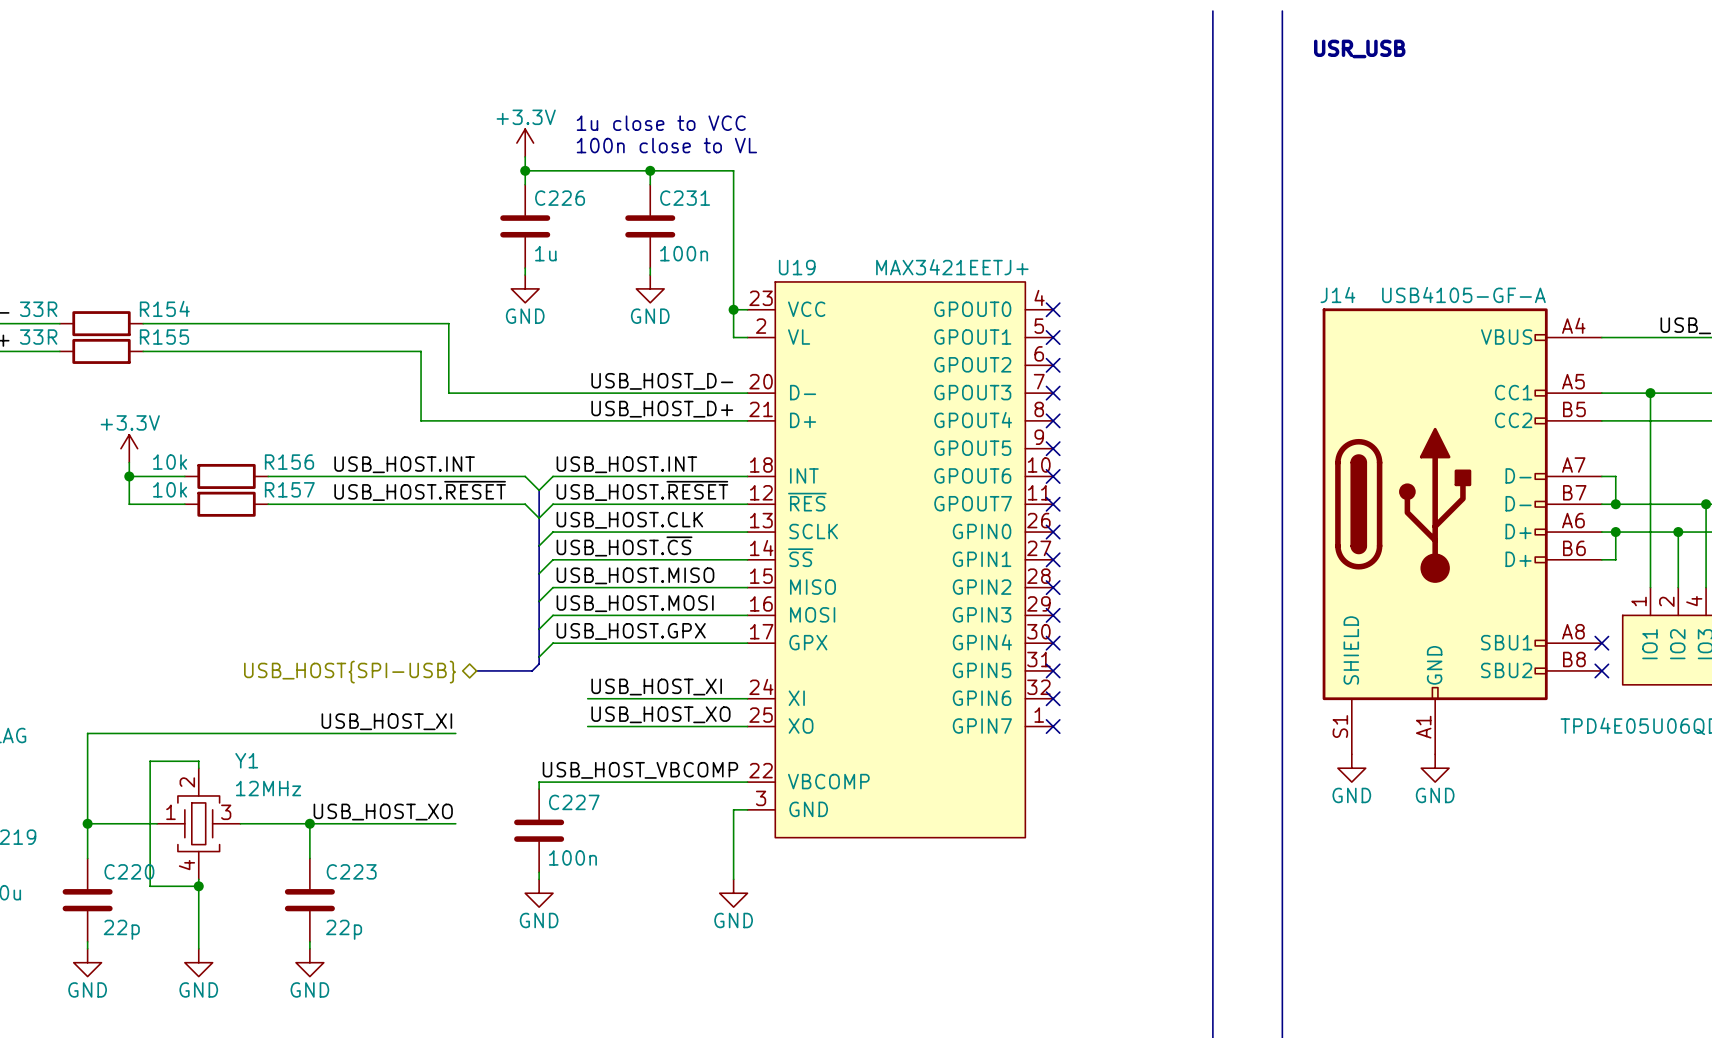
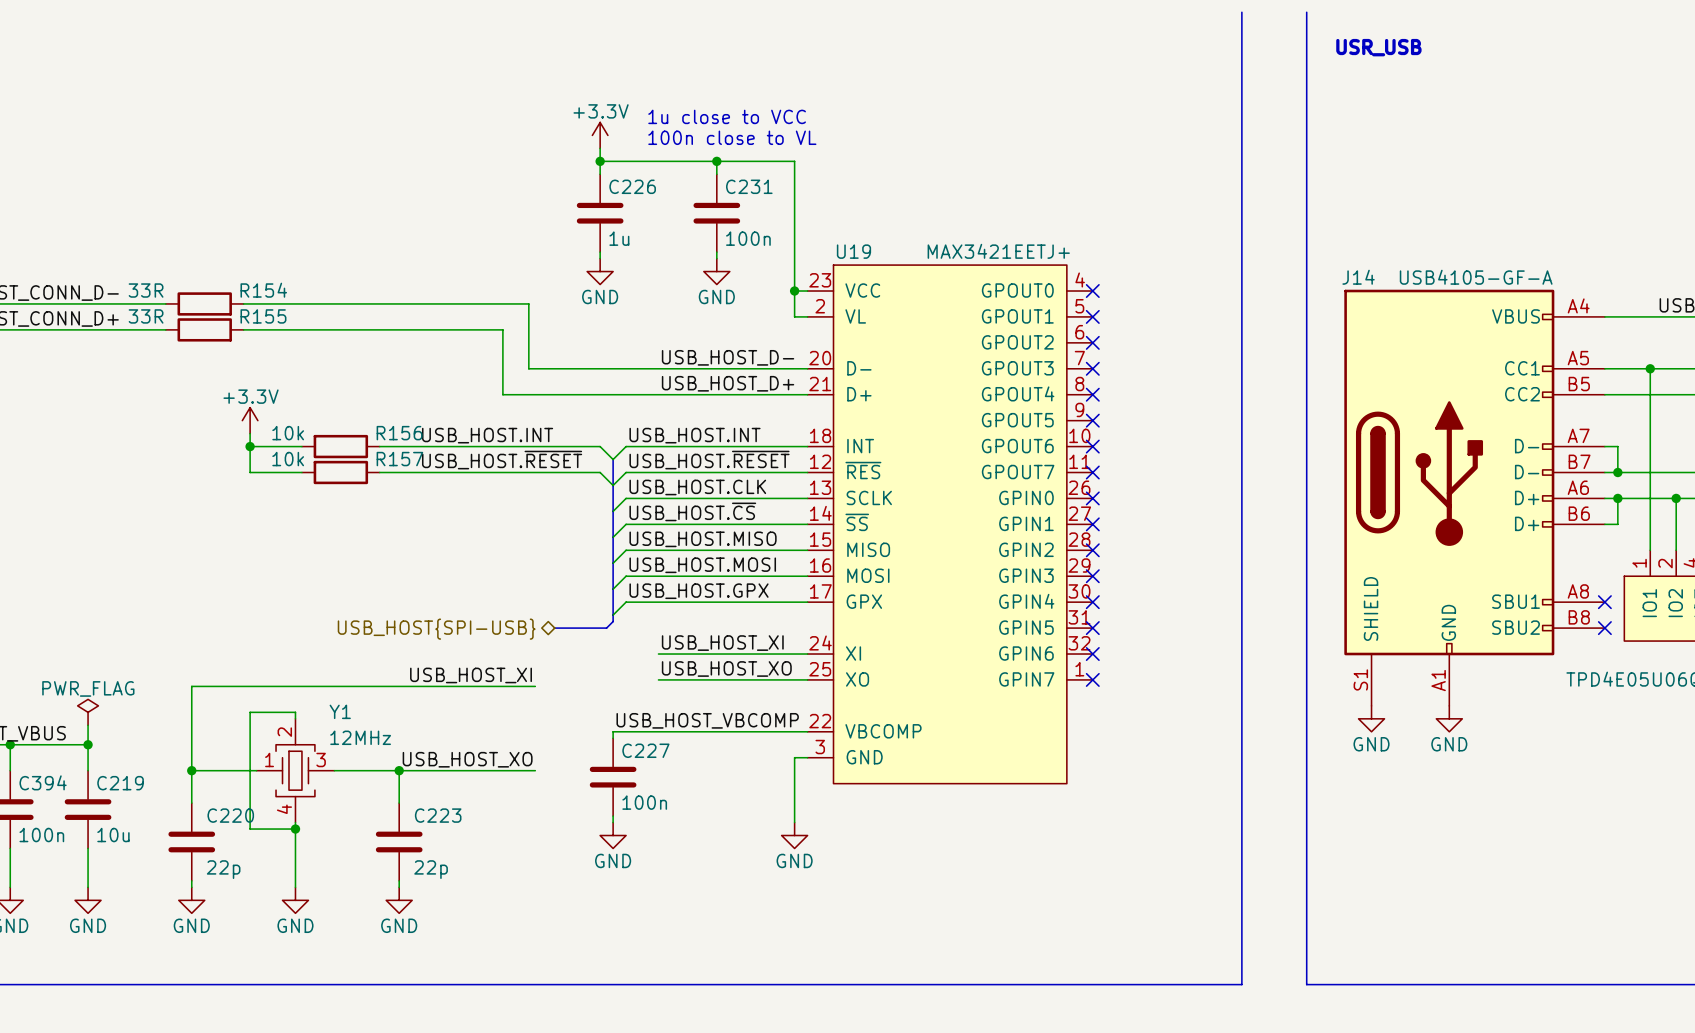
power symbol position: +3.3V (129, 448) -> +3.3V (250, 420)
wire: (129, 462) (129, 504) (150, 504) -> (250, 433) (250, 472)
wire: (129, 476) (150, 476) -> none
junction position: (129, 476) -> (250, 446)
R156 position: (226, 476) -> (340, 446)
R157 position: (226, 504) -> (340, 472)

